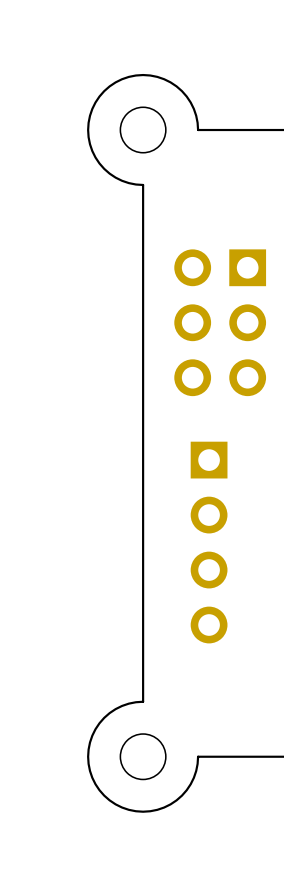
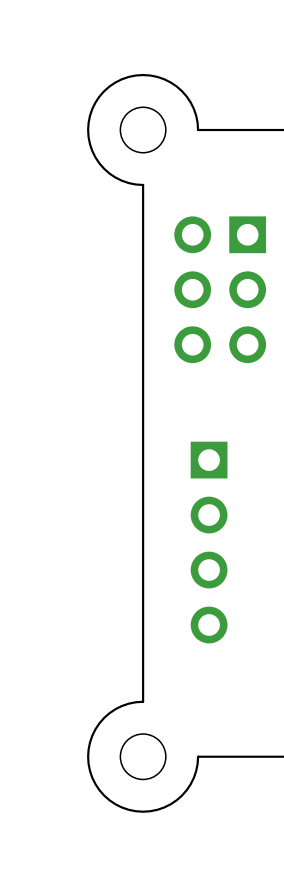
part position: (220, 322) -> (220, 289)

